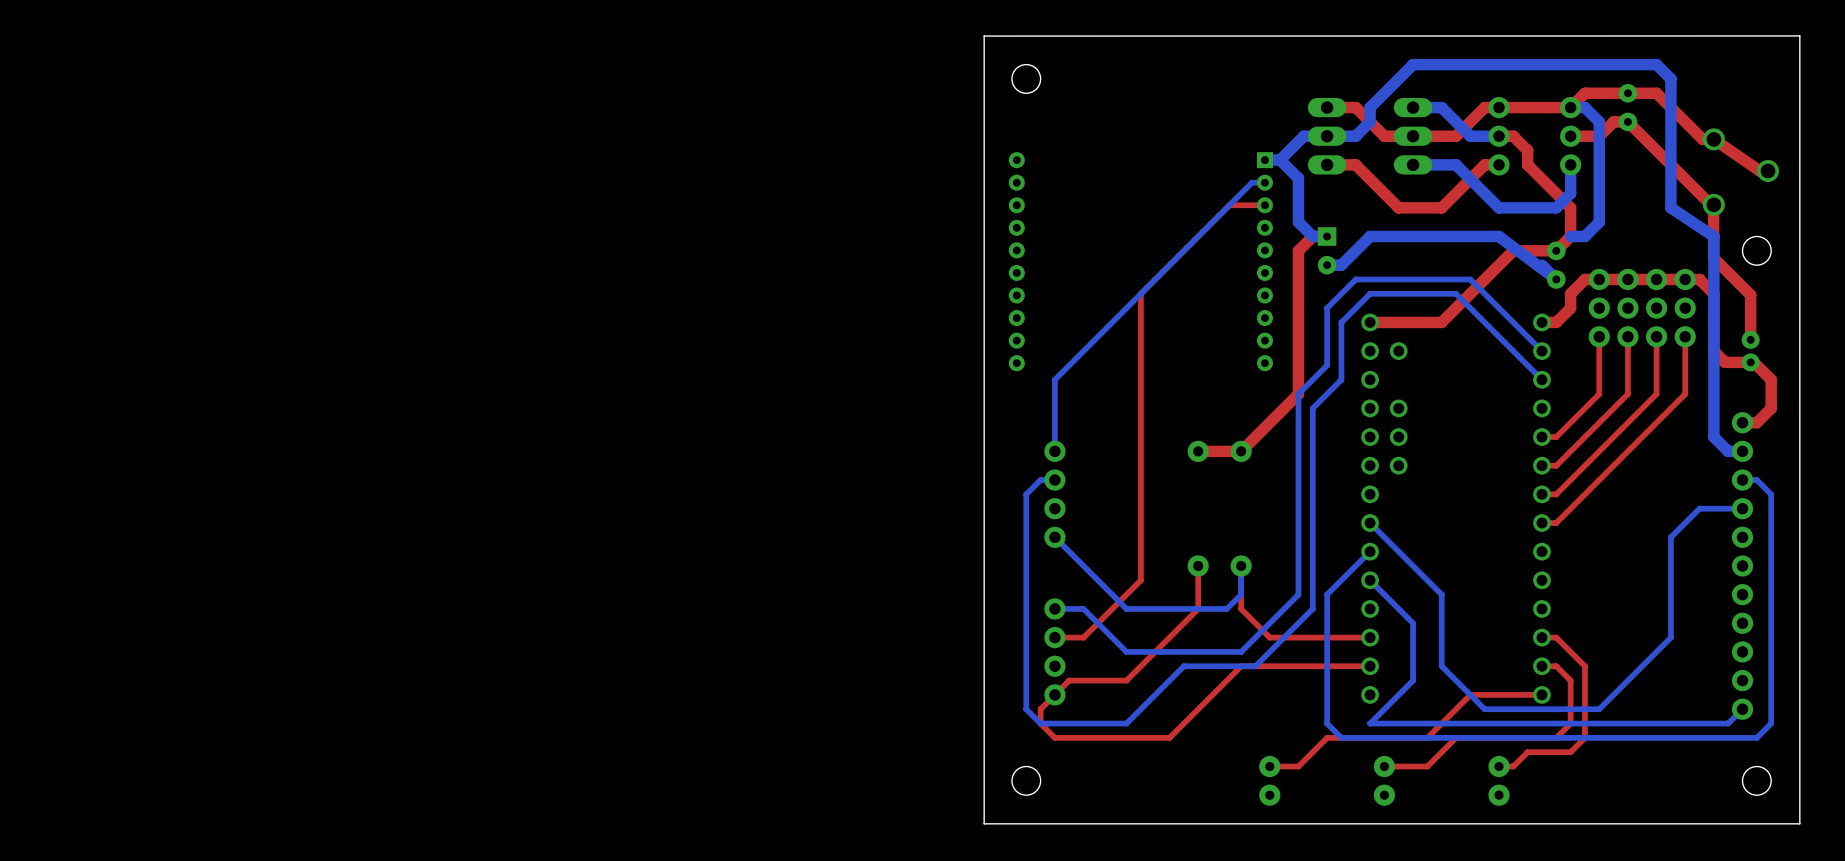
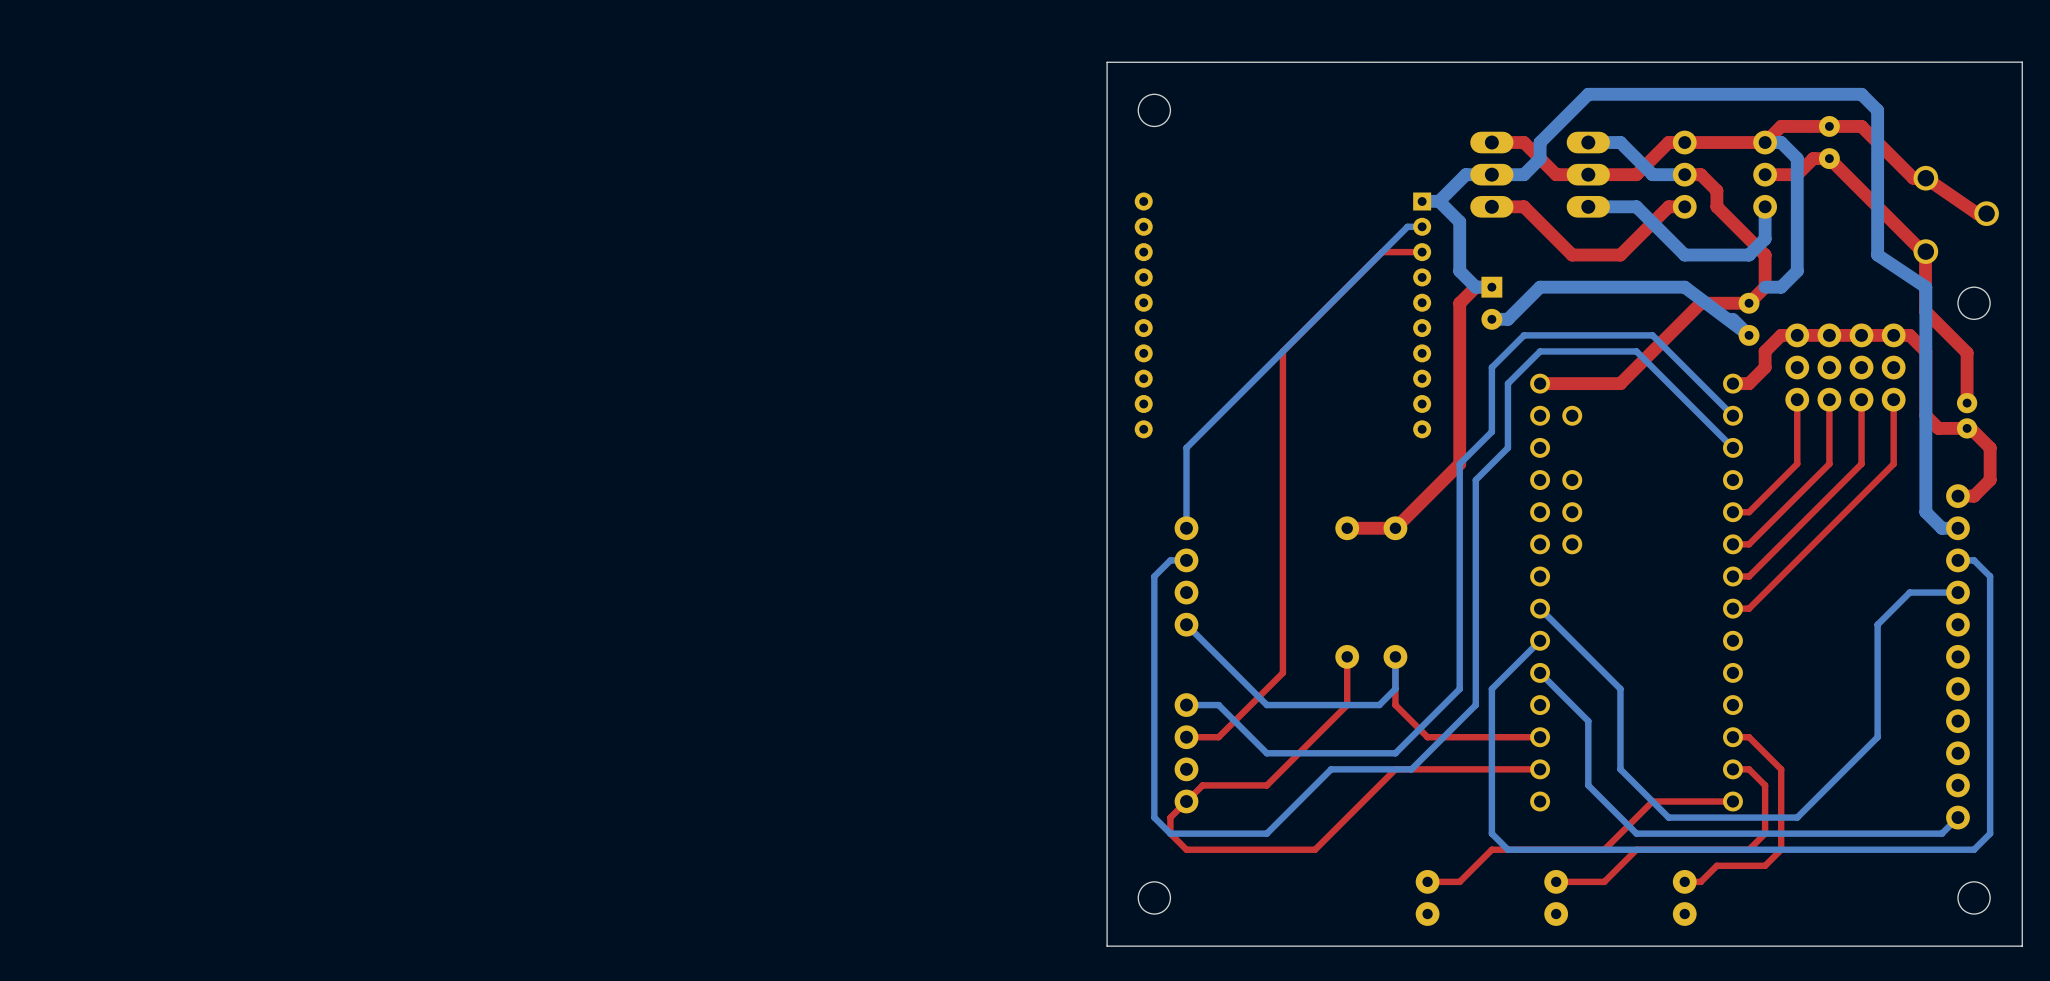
bottom track: (1413, 680) (1370, 723) (1456, 723) -> (1588, 785) (1636, 833)

